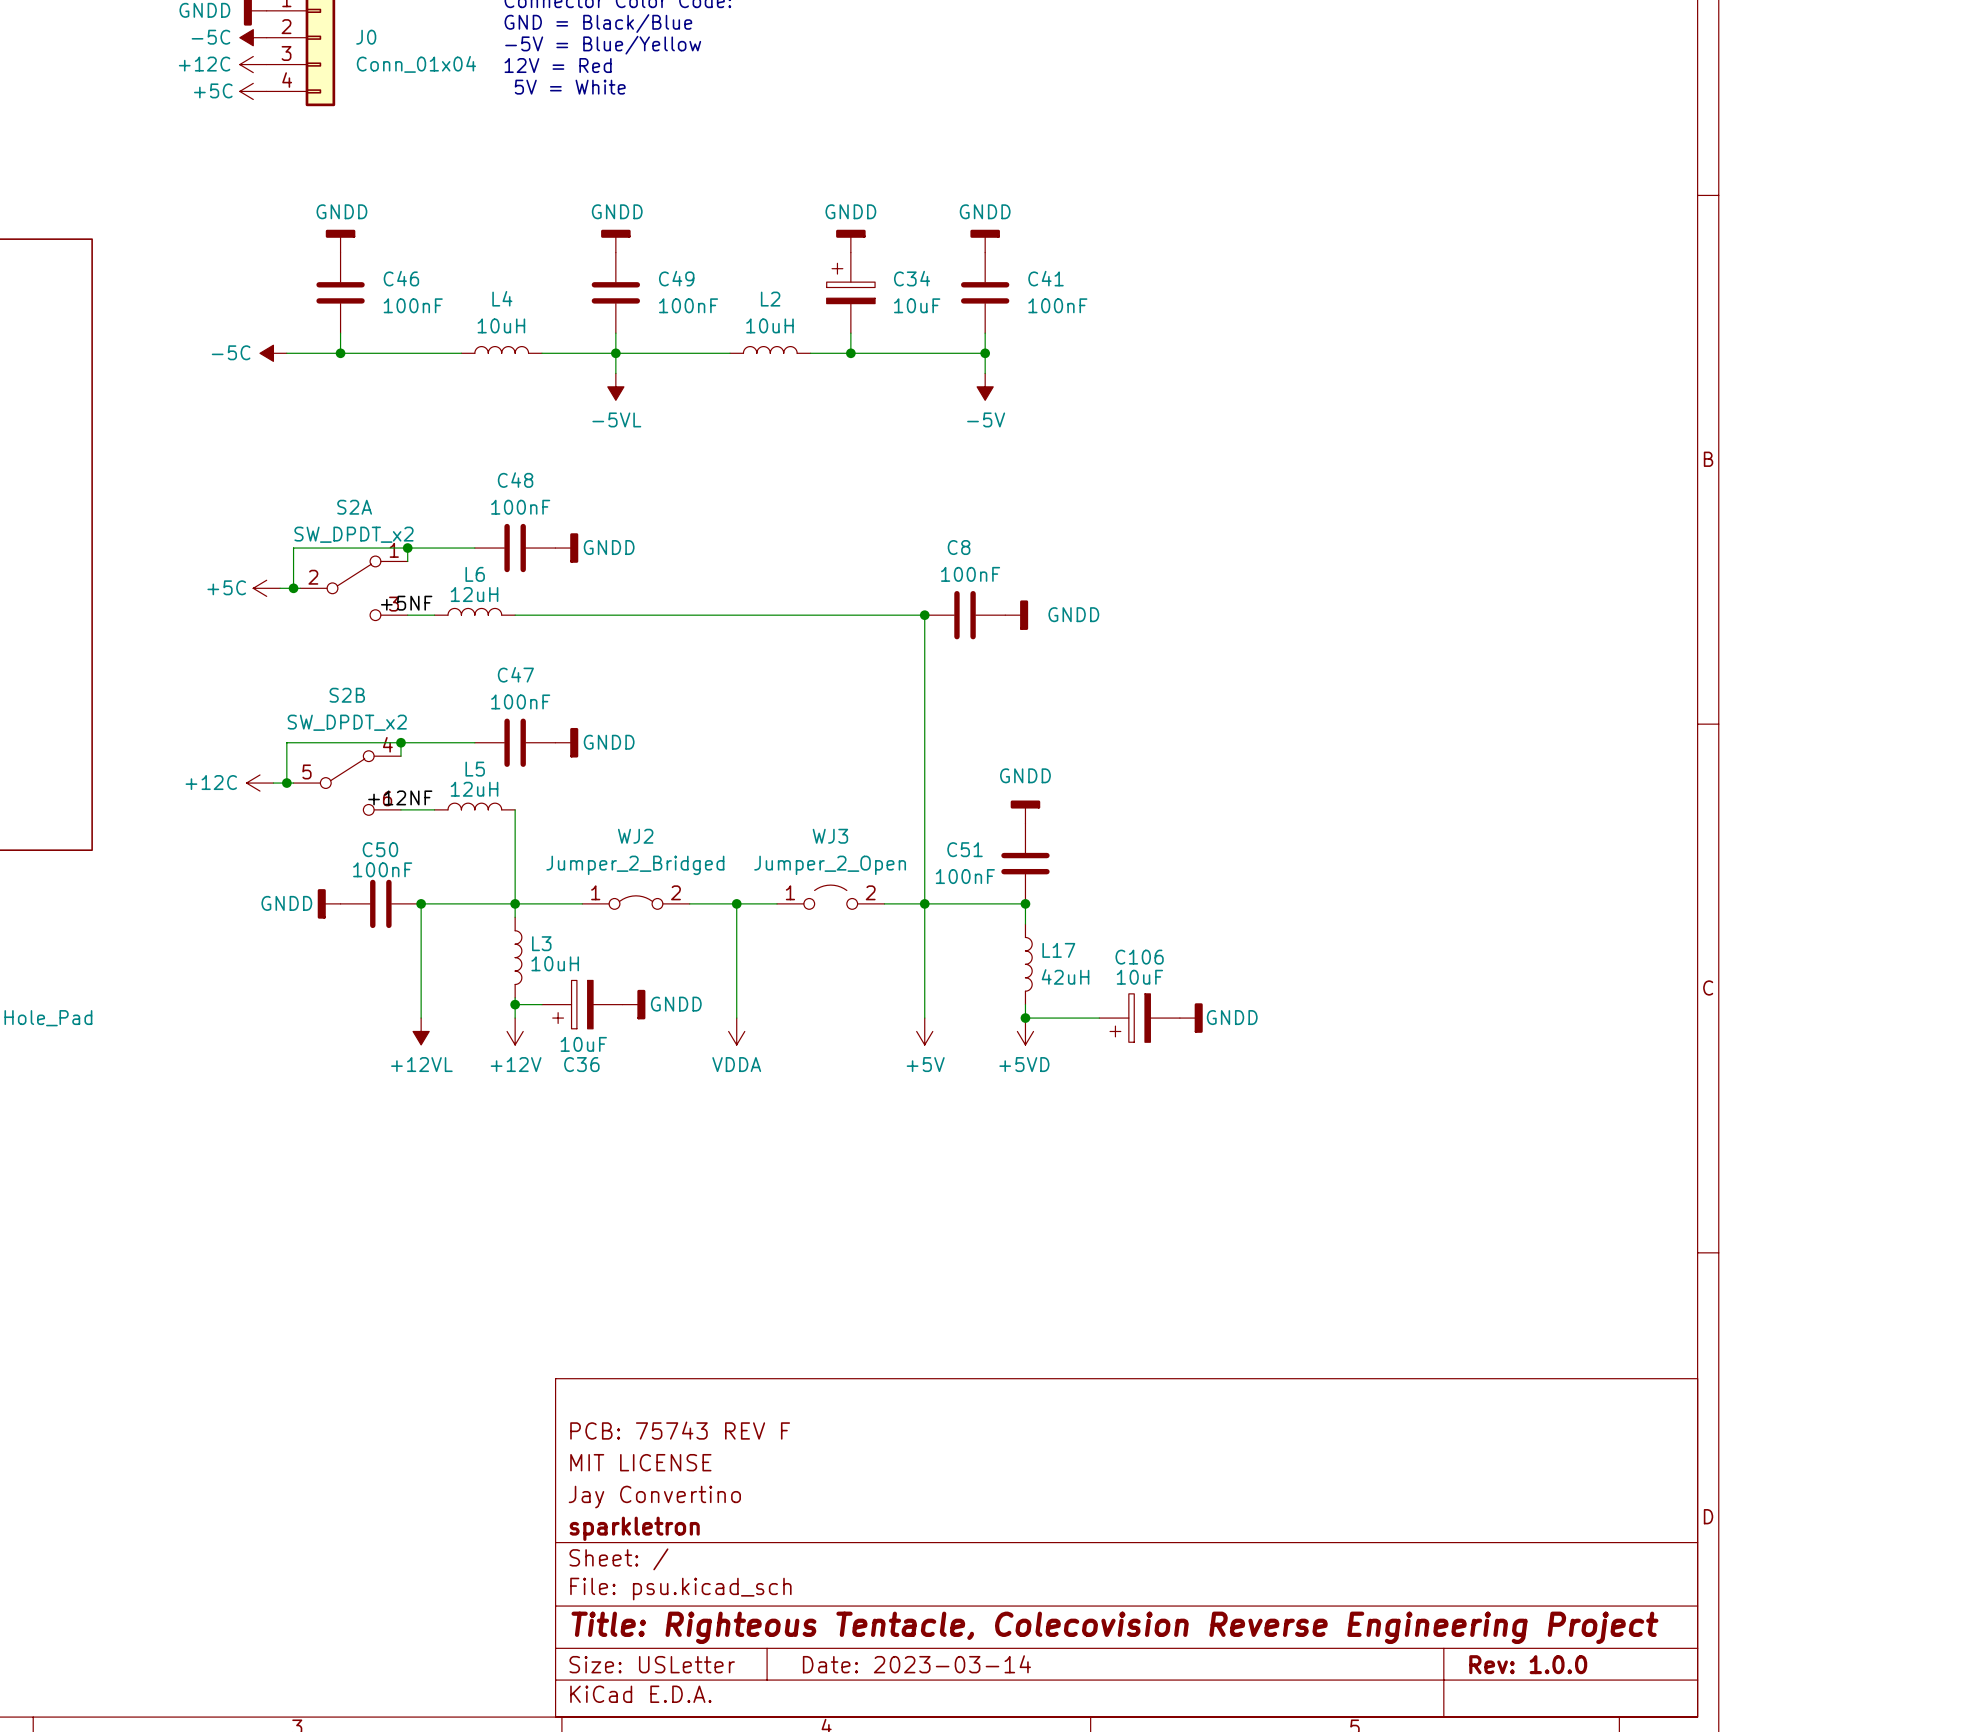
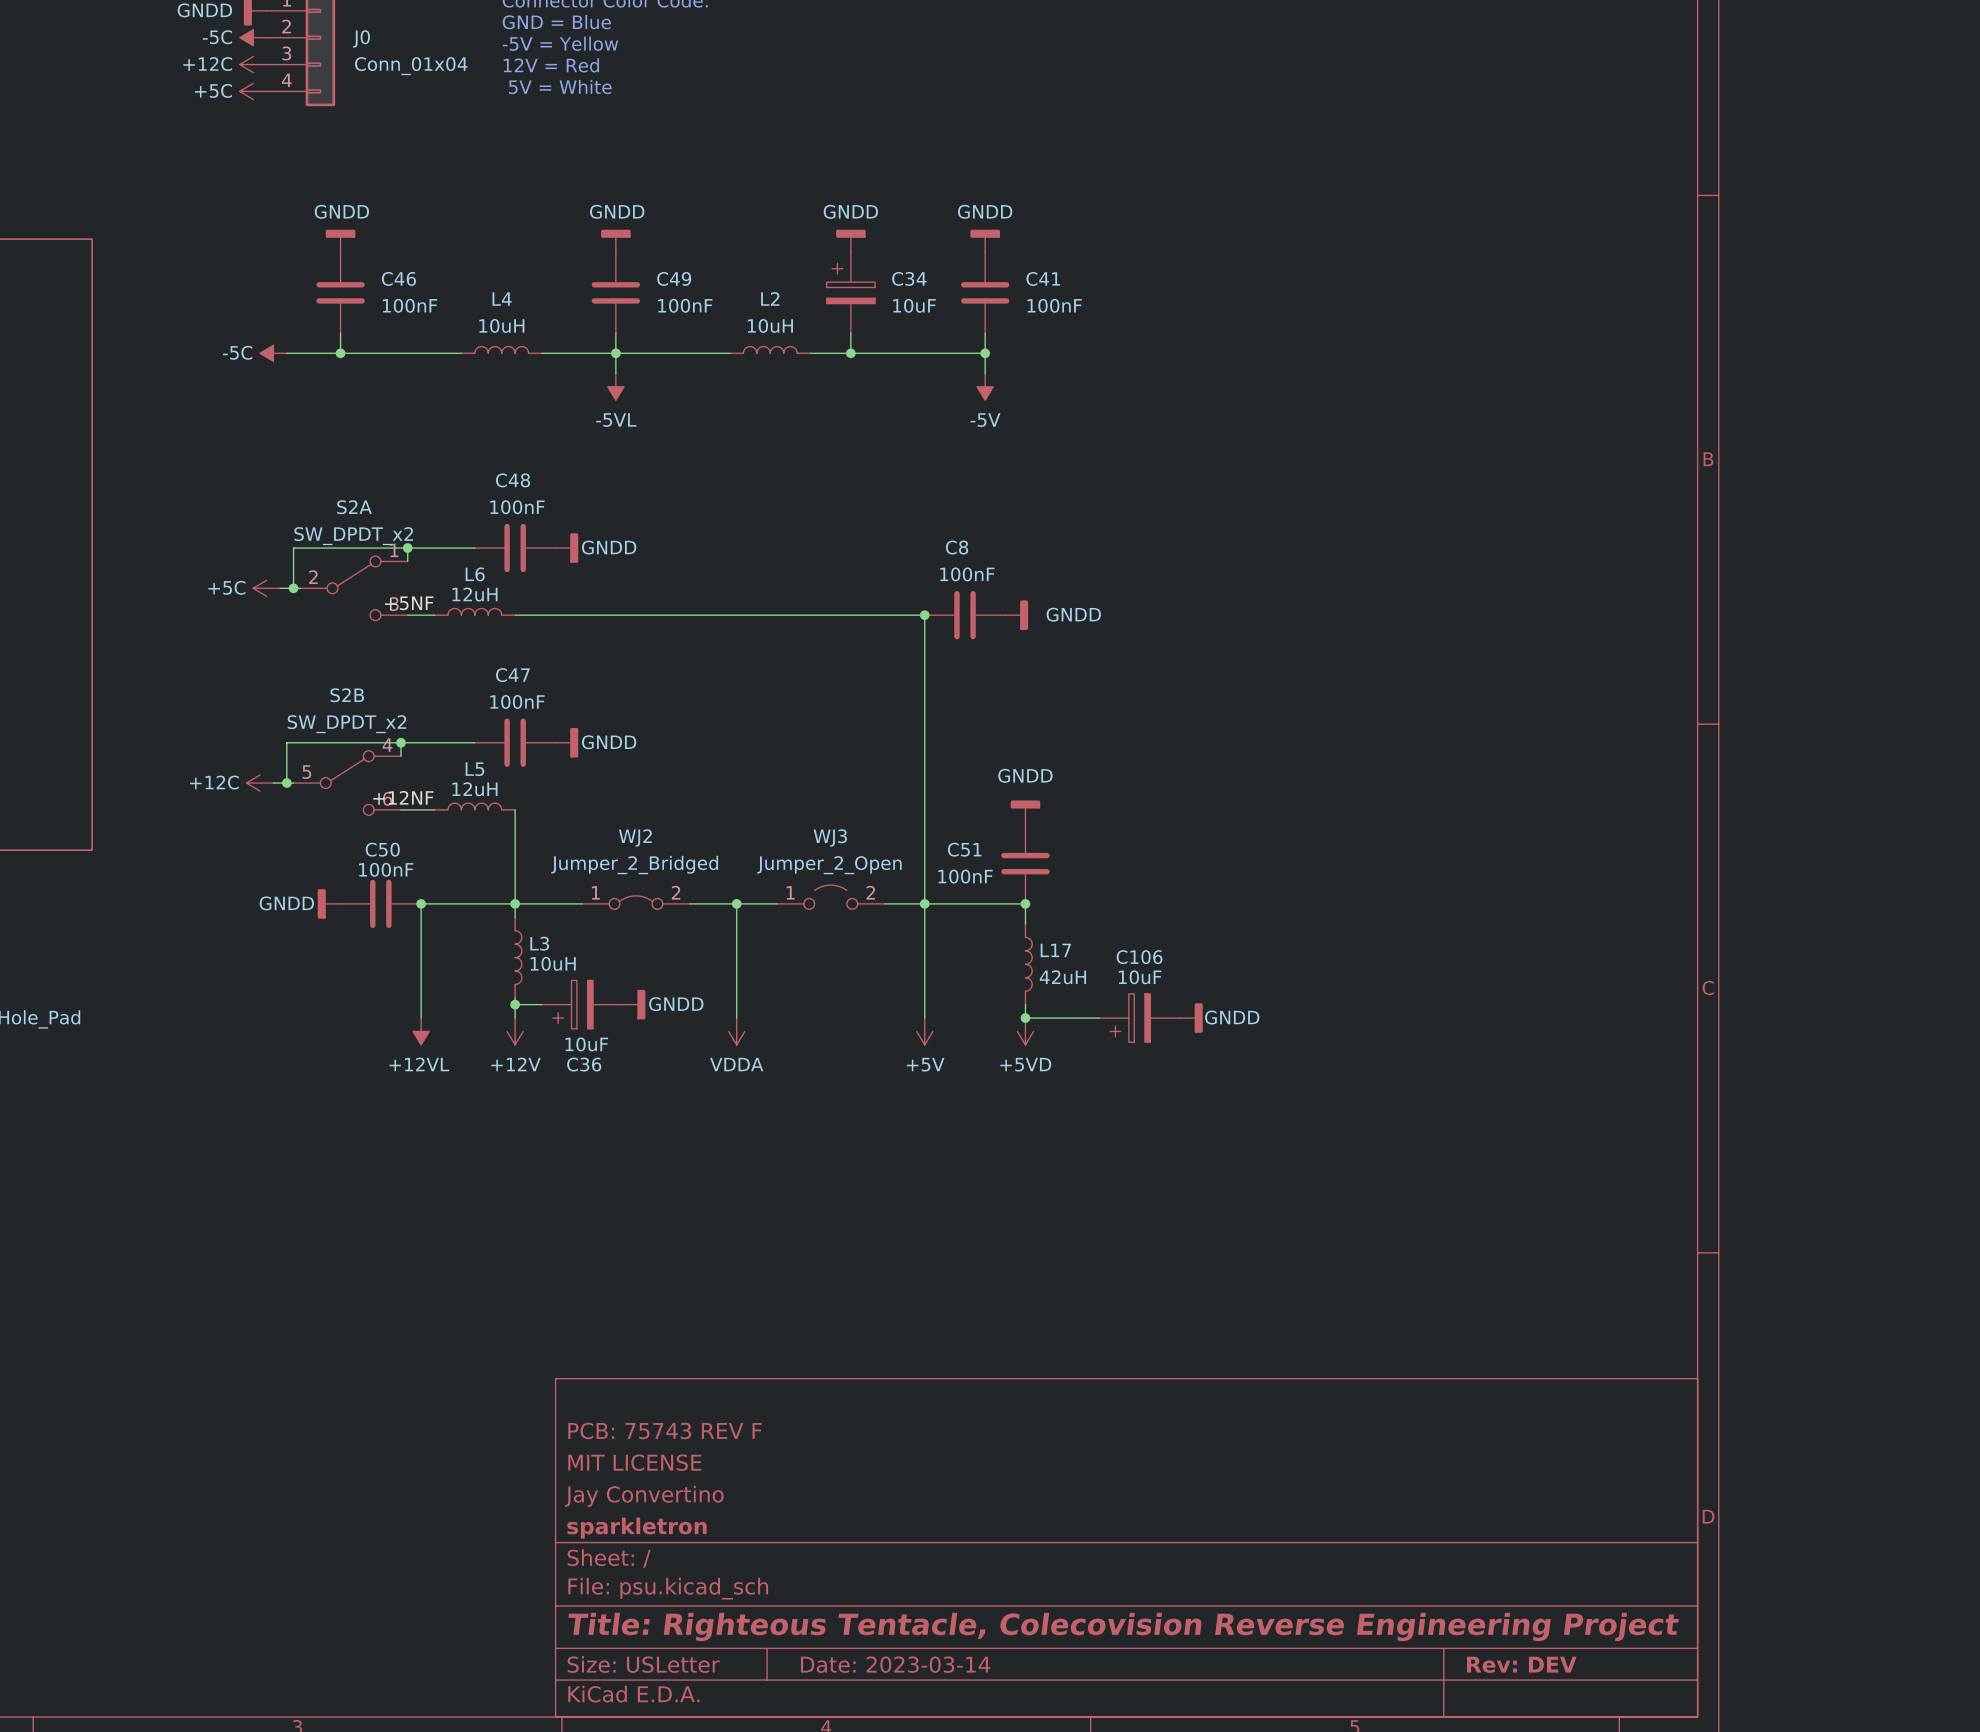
text: GND = Black/Blue (598, 23) -> GND = Blue (556, 22)
text: -5V = Blue/Yellow (603, 45) -> -5V = Yellow (560, 43)
title block: Rev: 1.0.0 (1528, 1664) -> Rev: DEV (1521, 1664)

